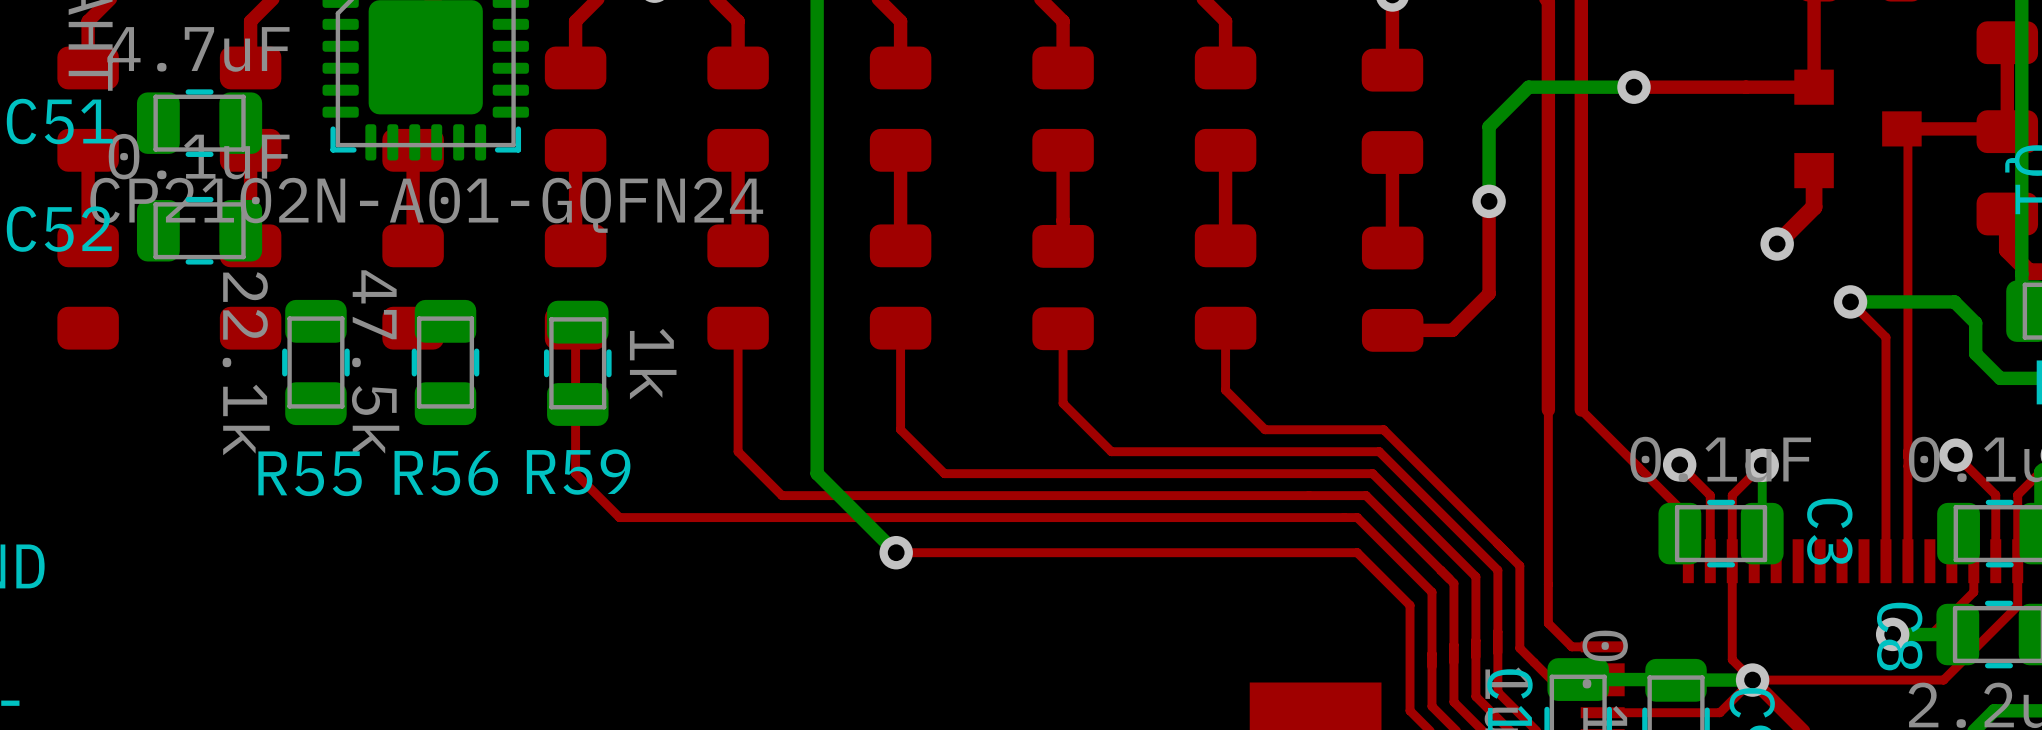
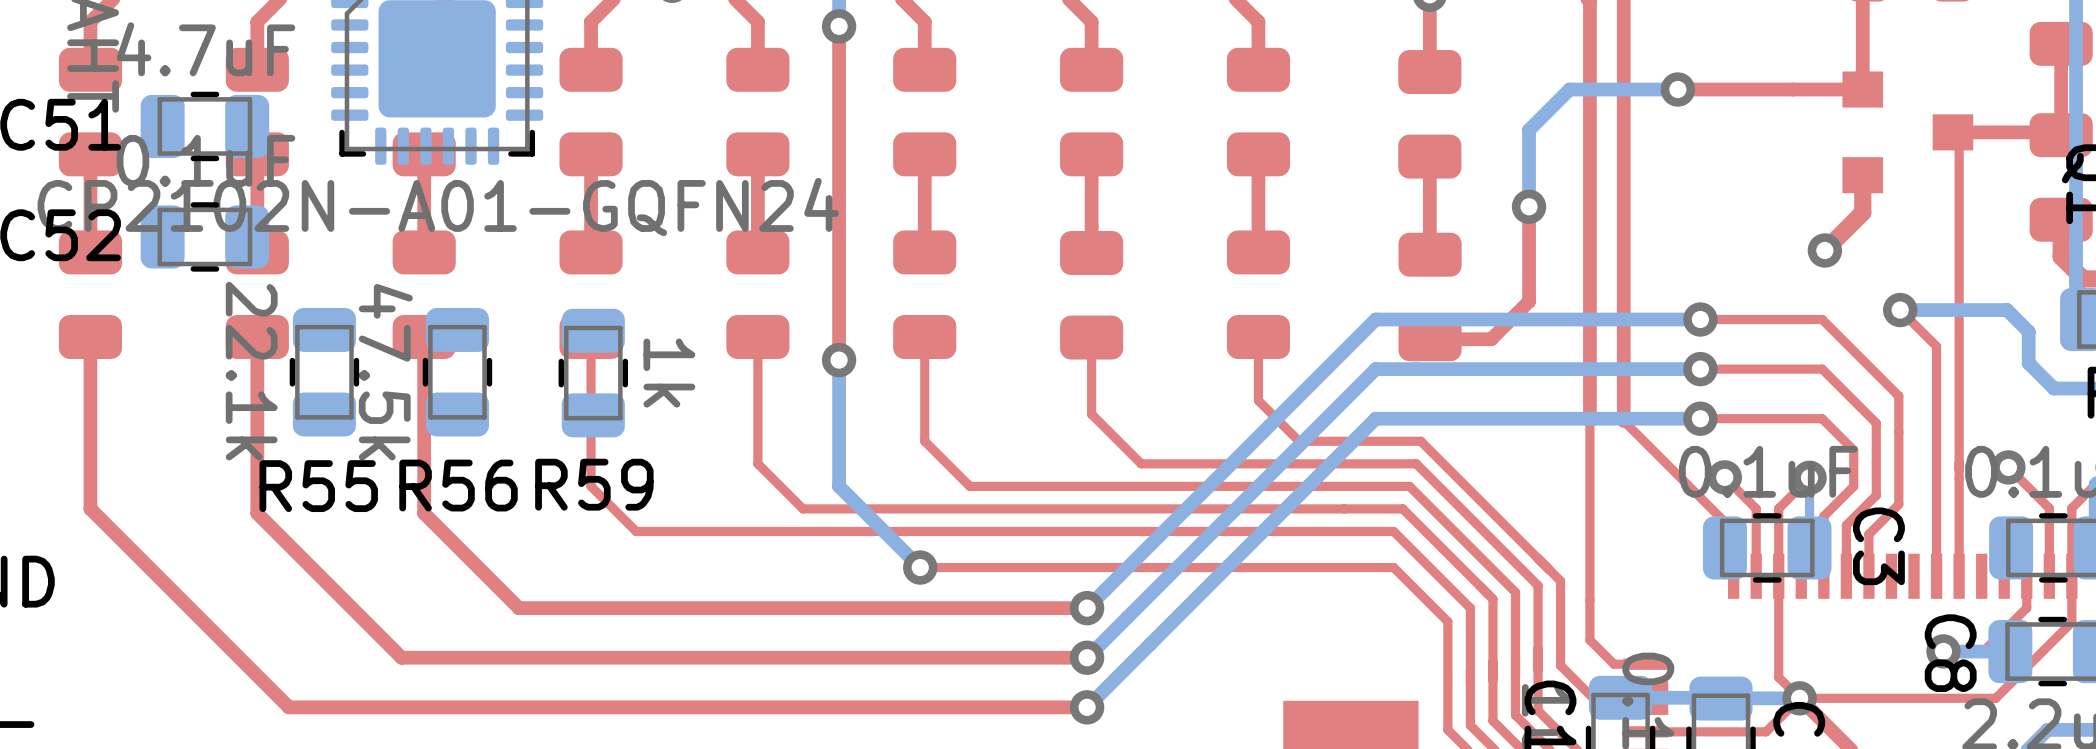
top track: none -> (839, 26) (839, 360)
bottom track: (817, 25) (817, 350) -> none
via: none -> (839, 26)
top track: none -> (1700, 319) (1822, 319) (1898, 396) (1898, 504) (1868, 534) (1868, 576)
bottom track: none -> (1700, 319) (1375, 319) (1087, 608)
via: none -> (1700, 319)
top track: none -> (90, 337) (90, 508) (288, 707) (1087, 707)
top track: none -> (257, 337) (257, 513) (401, 657) (1087, 657)
top track: none -> (424, 337) (424, 513) (518, 608) (1087, 608)
via: none -> (839, 360)
top track: none -> (1700, 369) (1822, 369) (1876, 423) (1876, 495) (1846, 525) (1846, 576)
bottom track: none -> (1700, 369) (1375, 369) (1087, 657)
via: none -> (1700, 369)
top track: none -> (1700, 418) (1822, 418) (1853, 450) (1853, 486) (1823, 516) (1823, 576)
bottom track: none -> (1700, 418) (1375, 418) (1087, 707)
via: none -> (1700, 418)
via: none -> (1087, 608)
via: none -> (1087, 657)
via: none -> (1087, 707)

